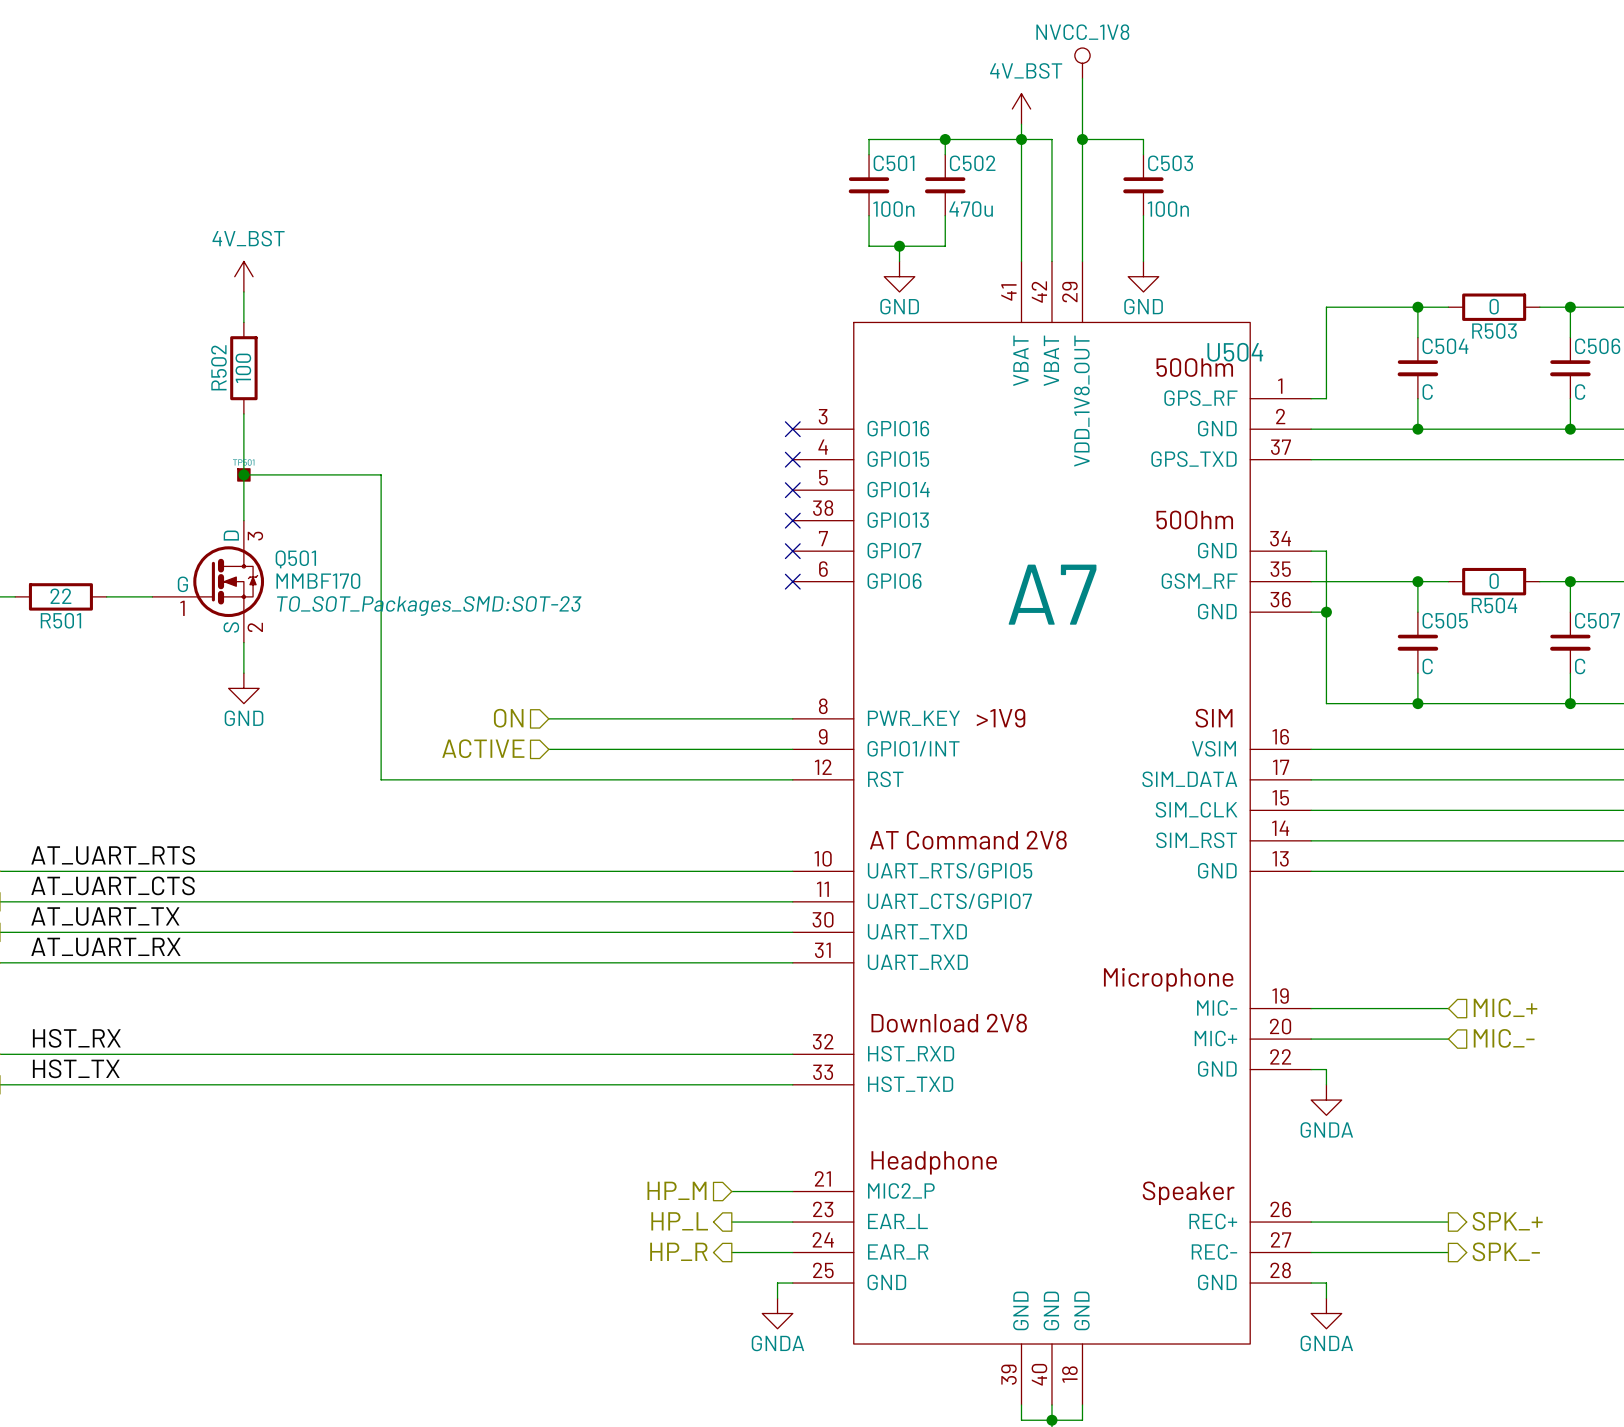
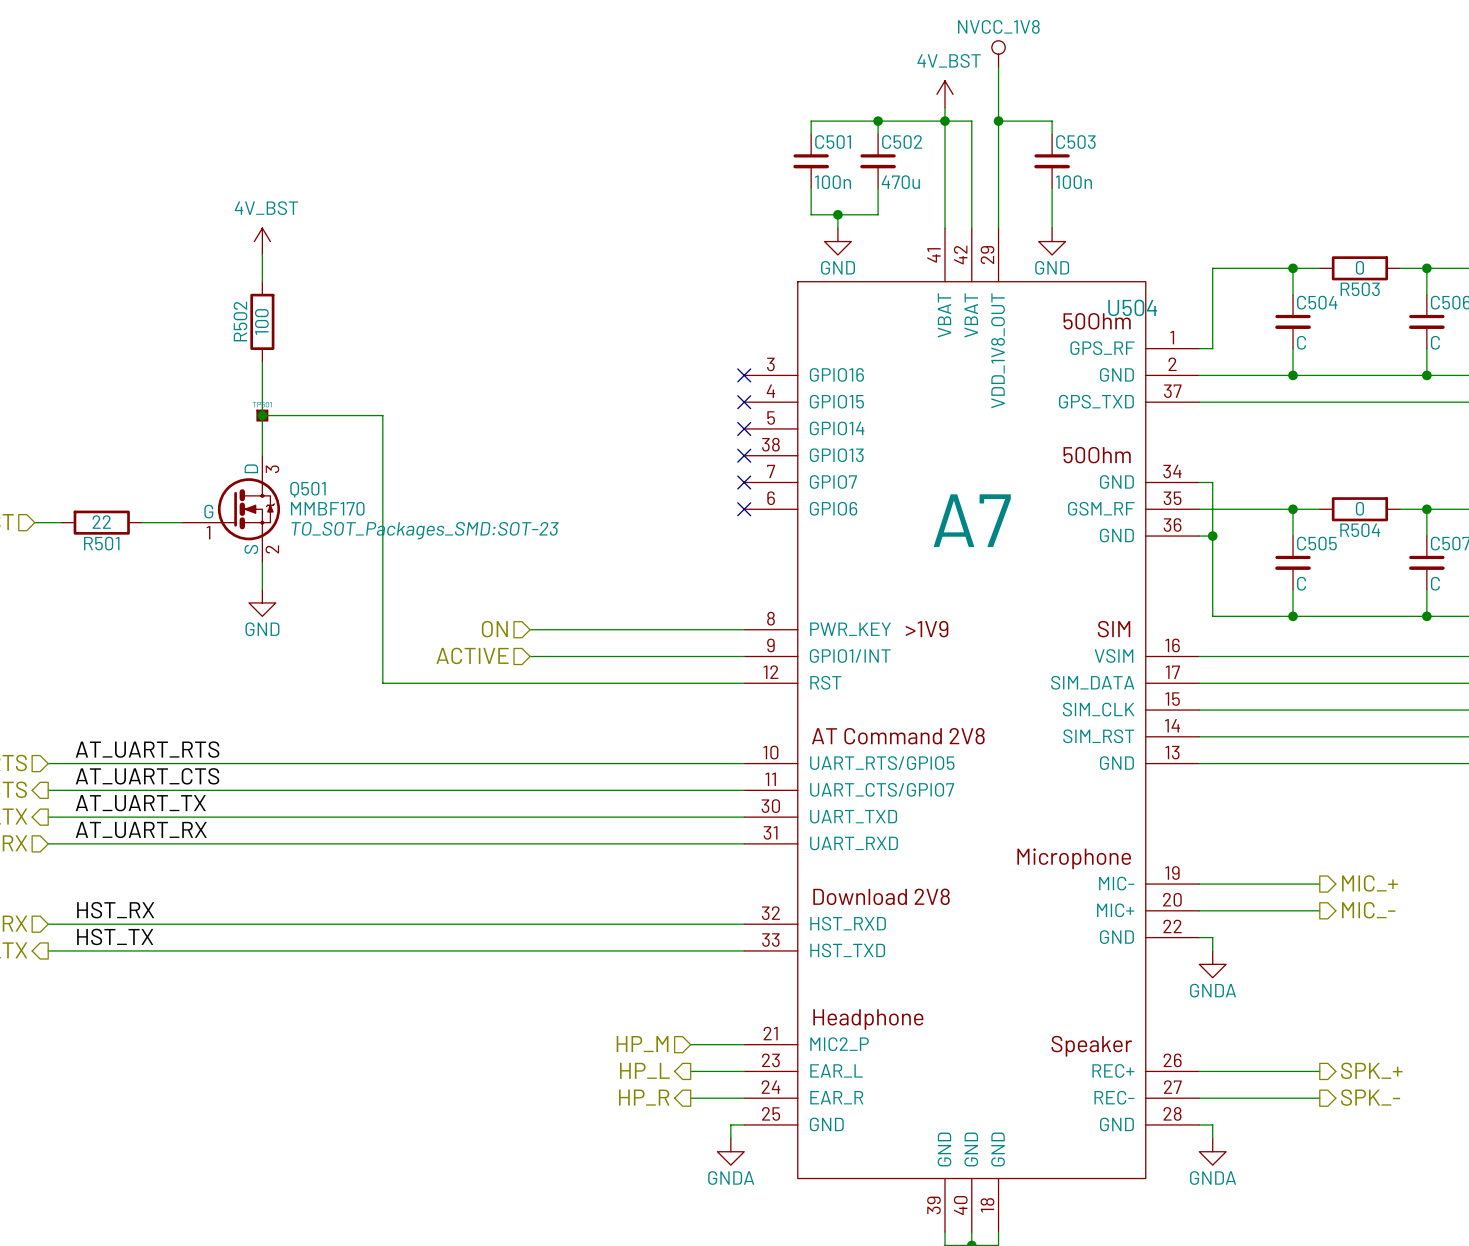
hierarchical label shape: input (1505, 1007) -> output (1369, 883)
hierarchical label shape: input (1504, 1038) -> output (1368, 910)

